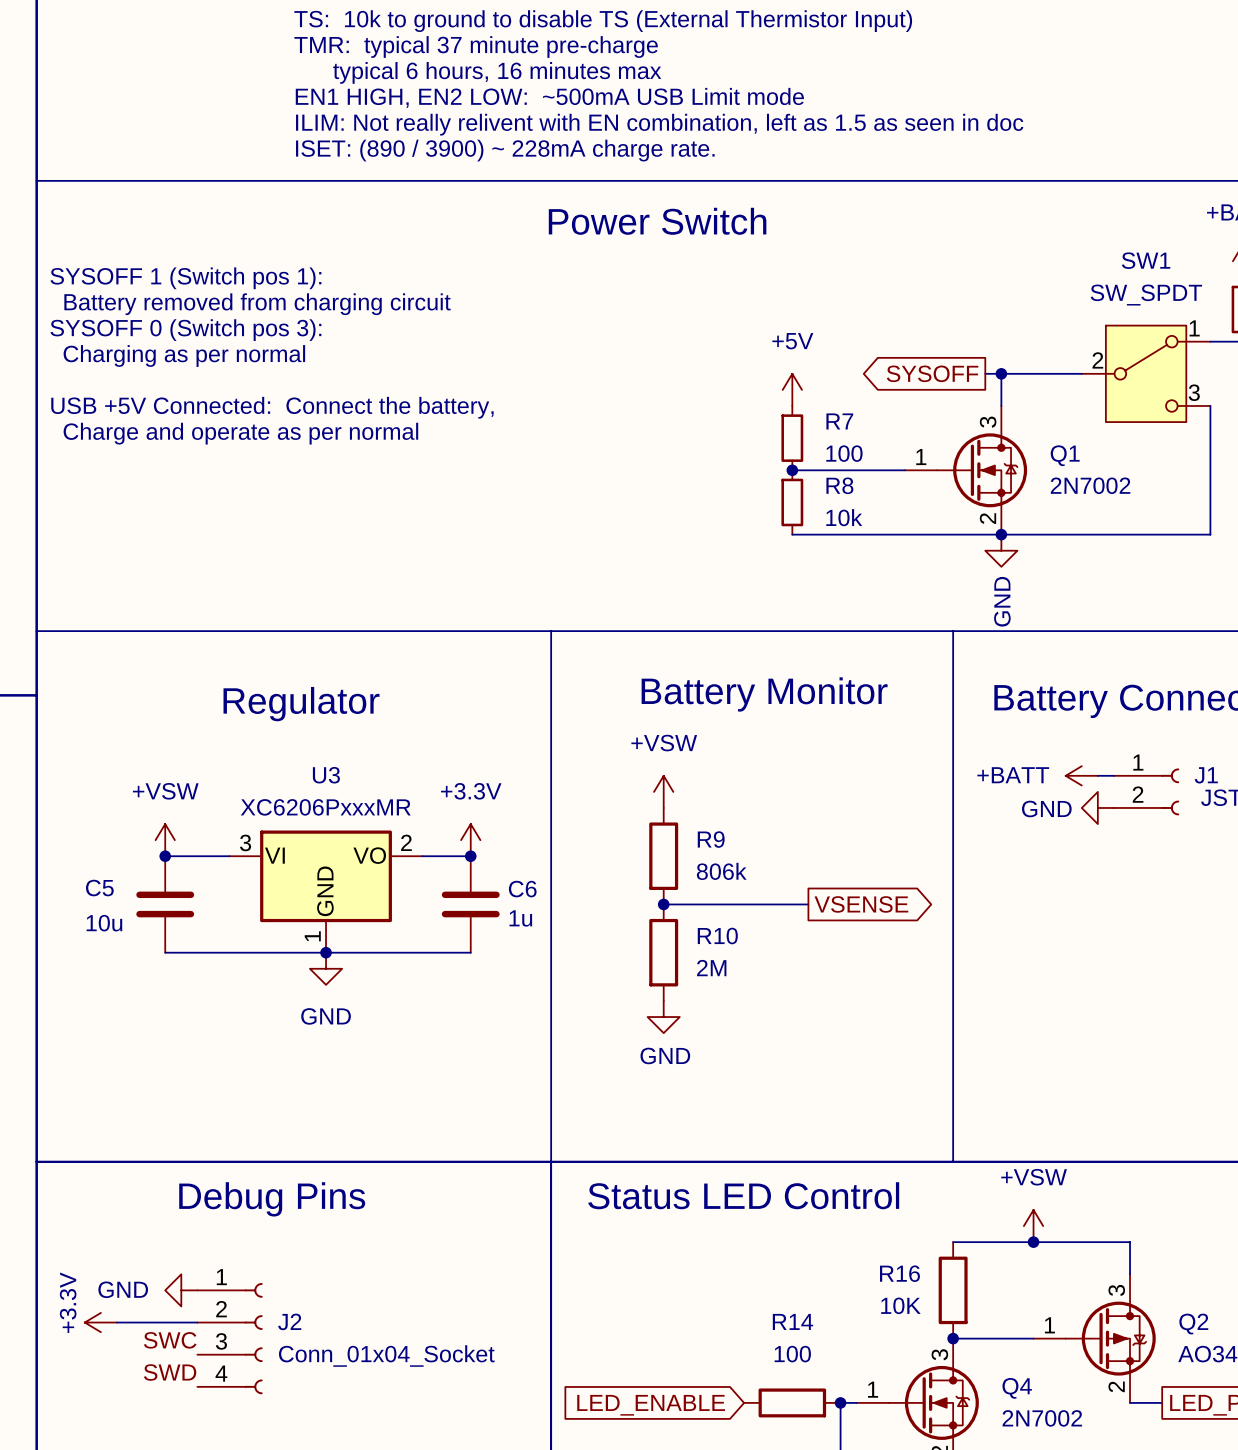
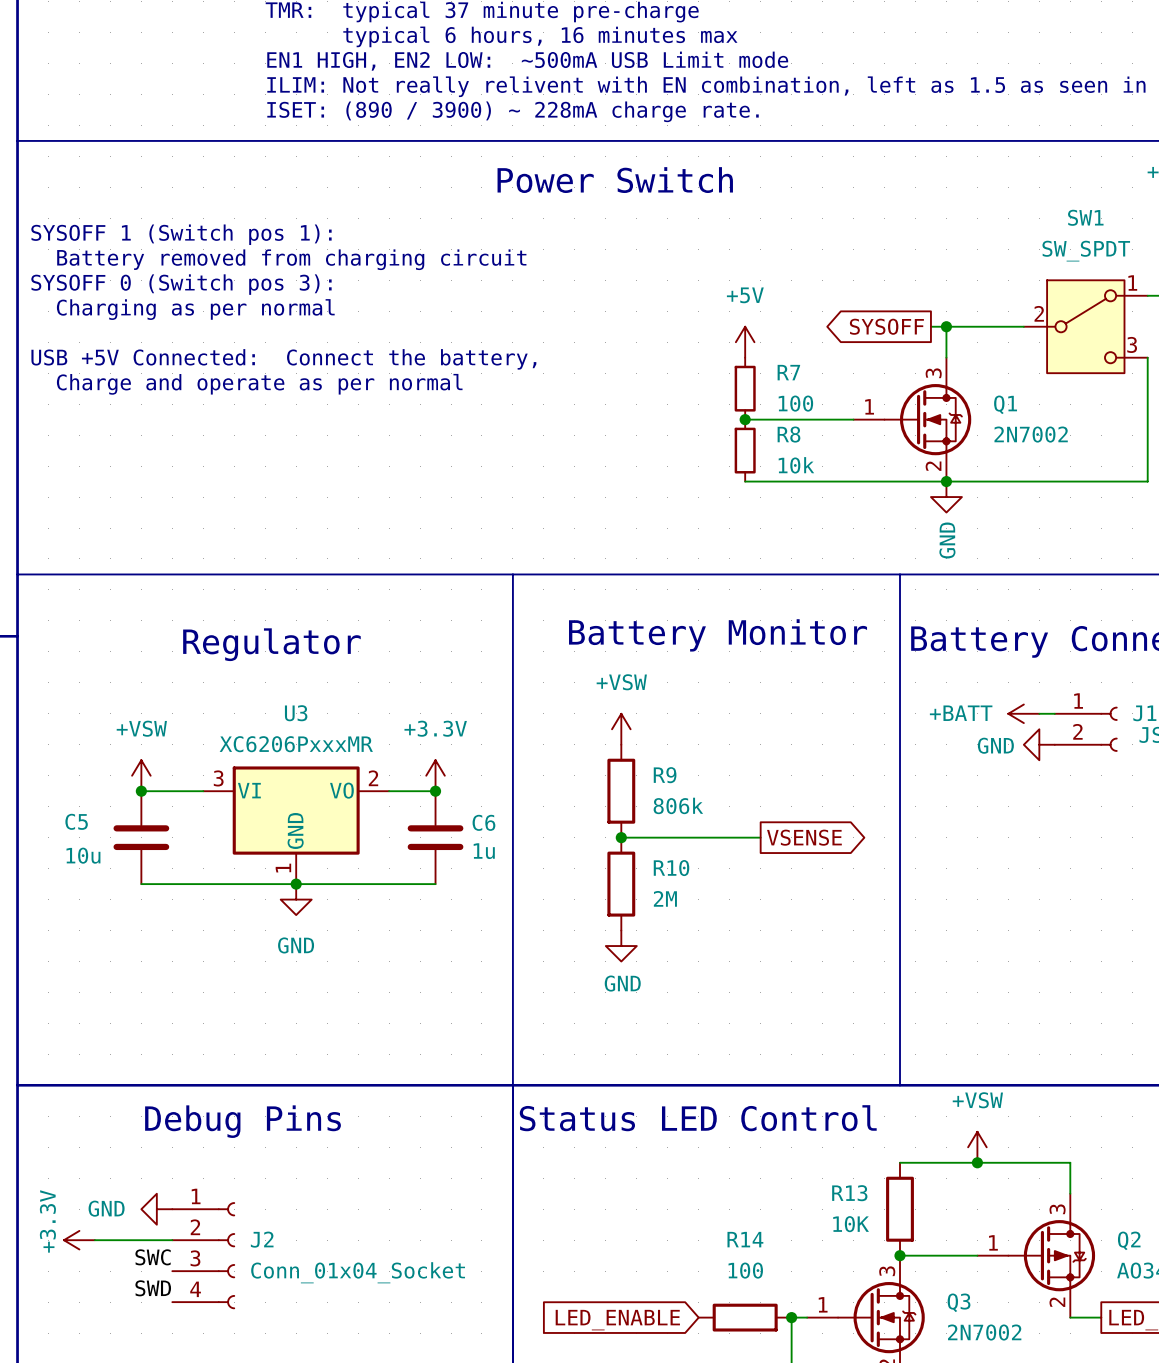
R16 name: R16 (899, 1273) -> R13 (849, 1193)
Q4 name: Q4 (1017, 1388) -> Q3 (959, 1302)

